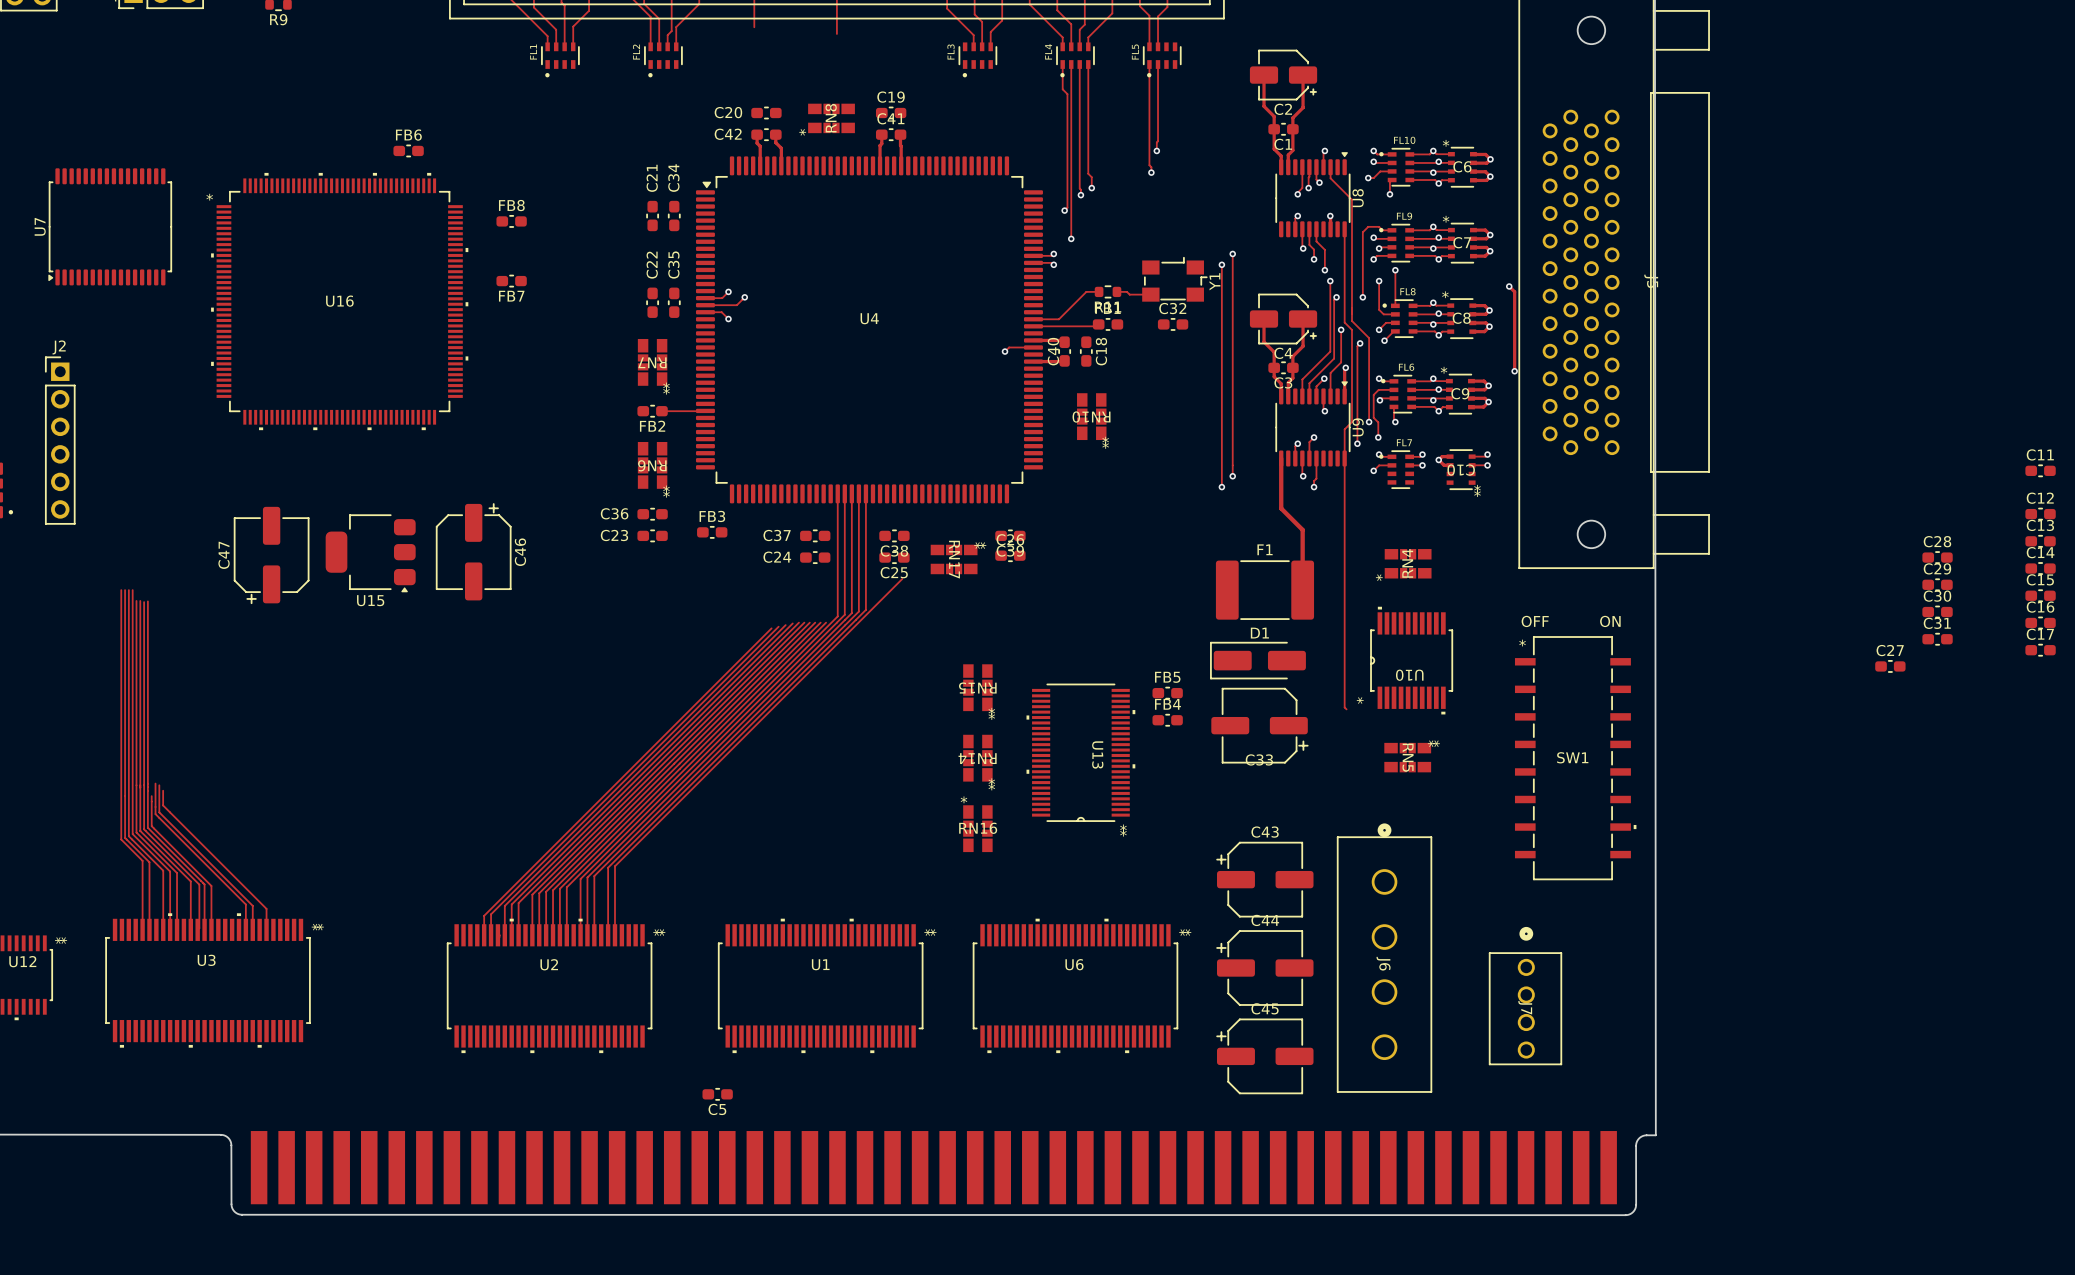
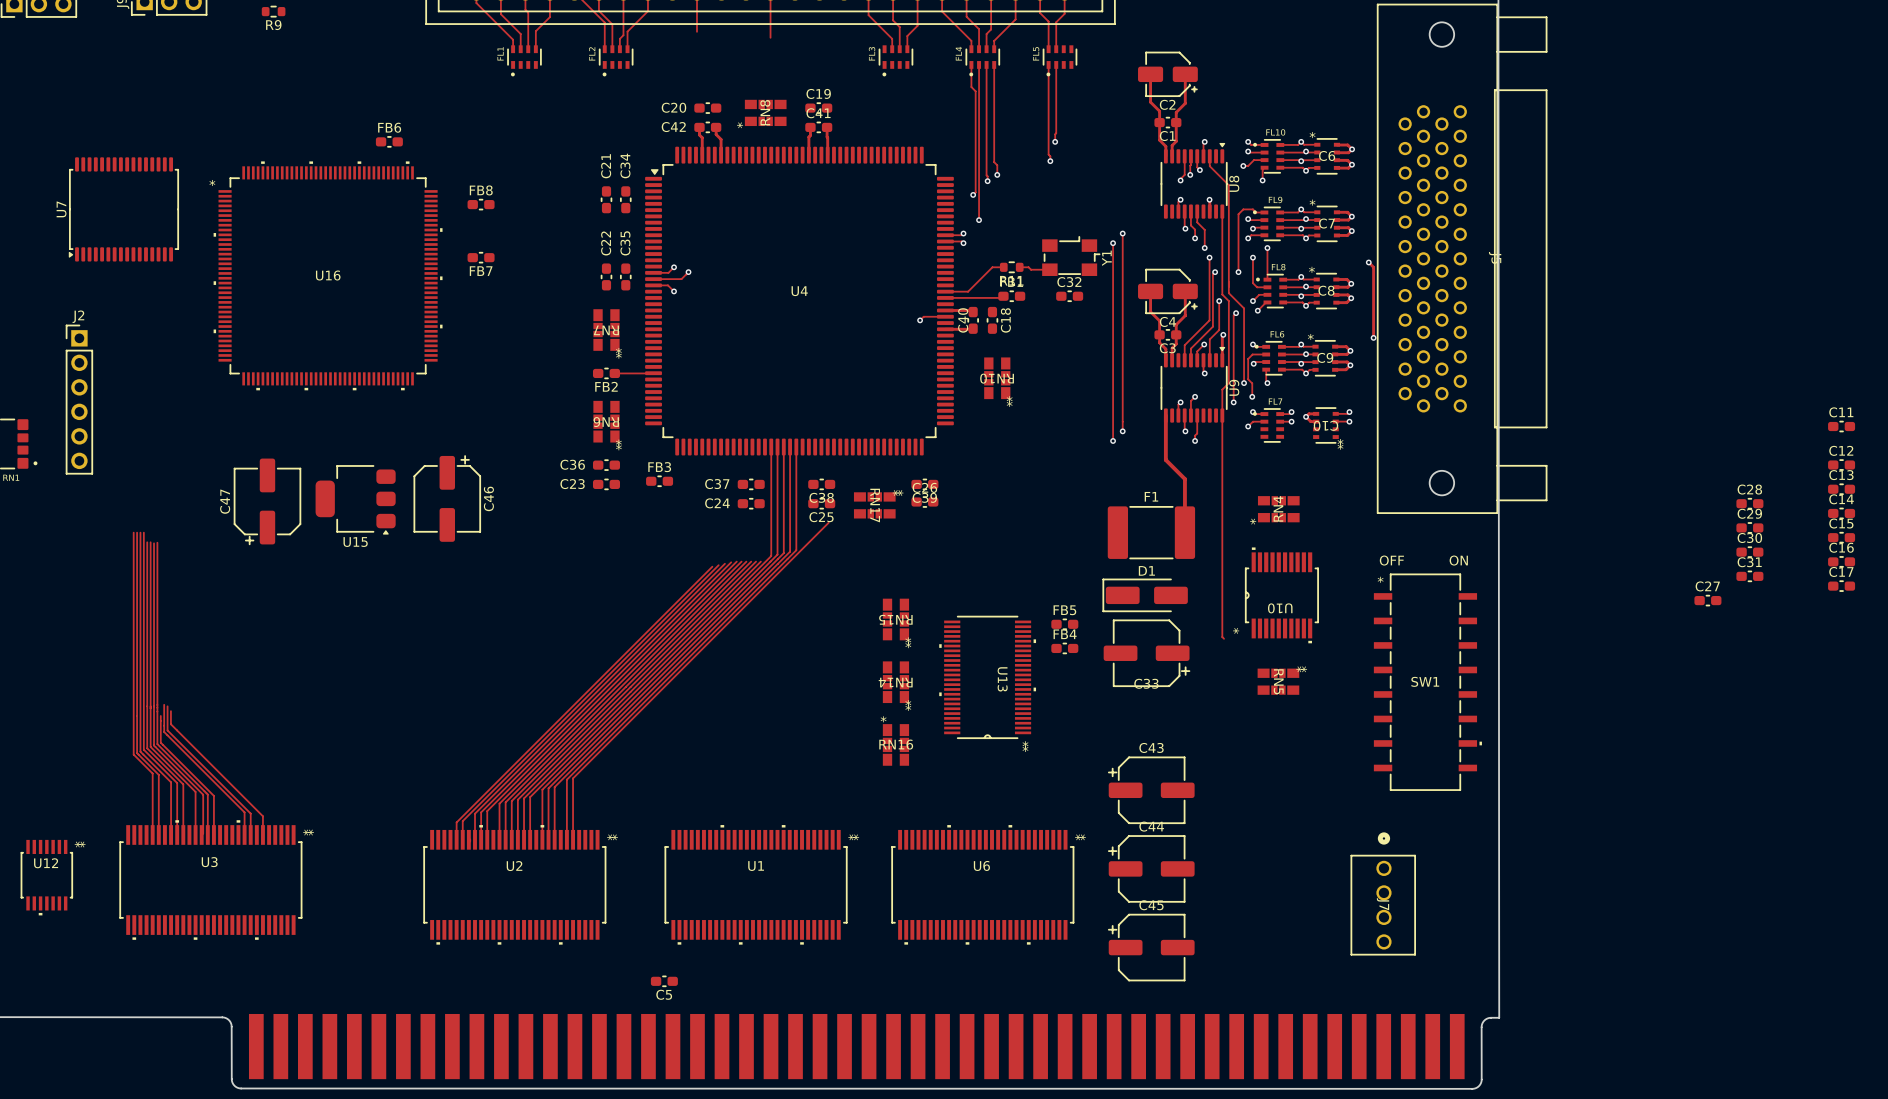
J6: (1384, 958) -> none

